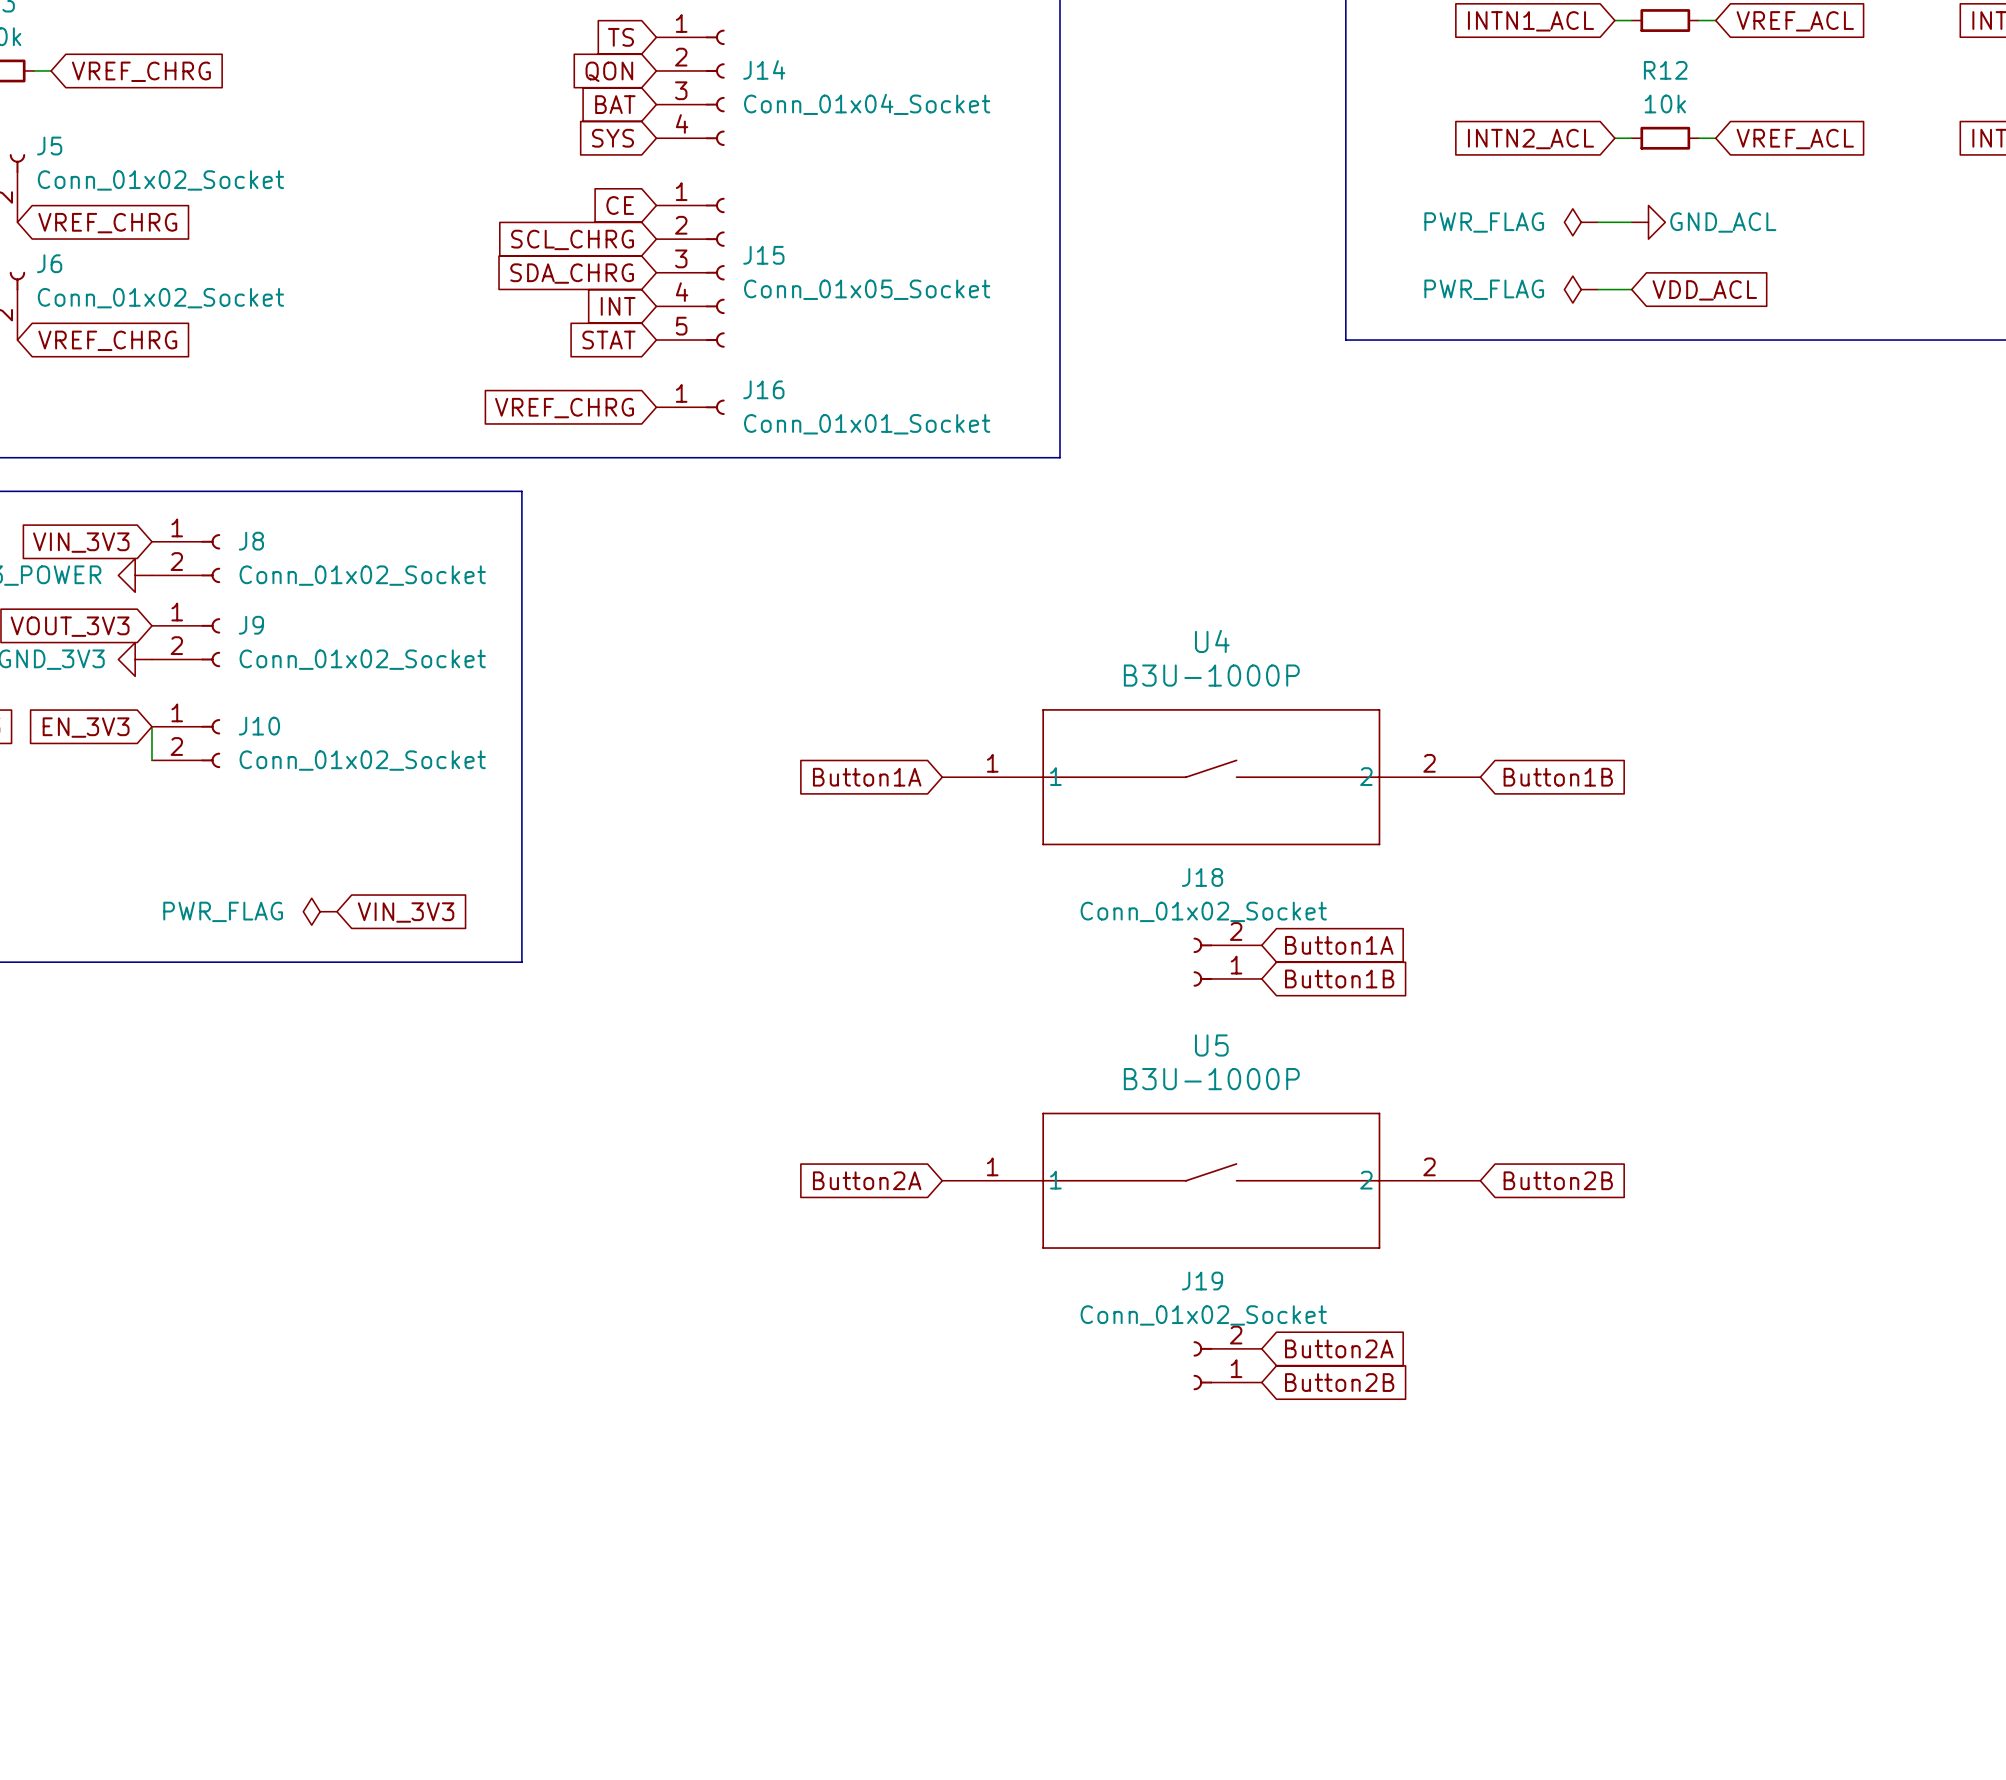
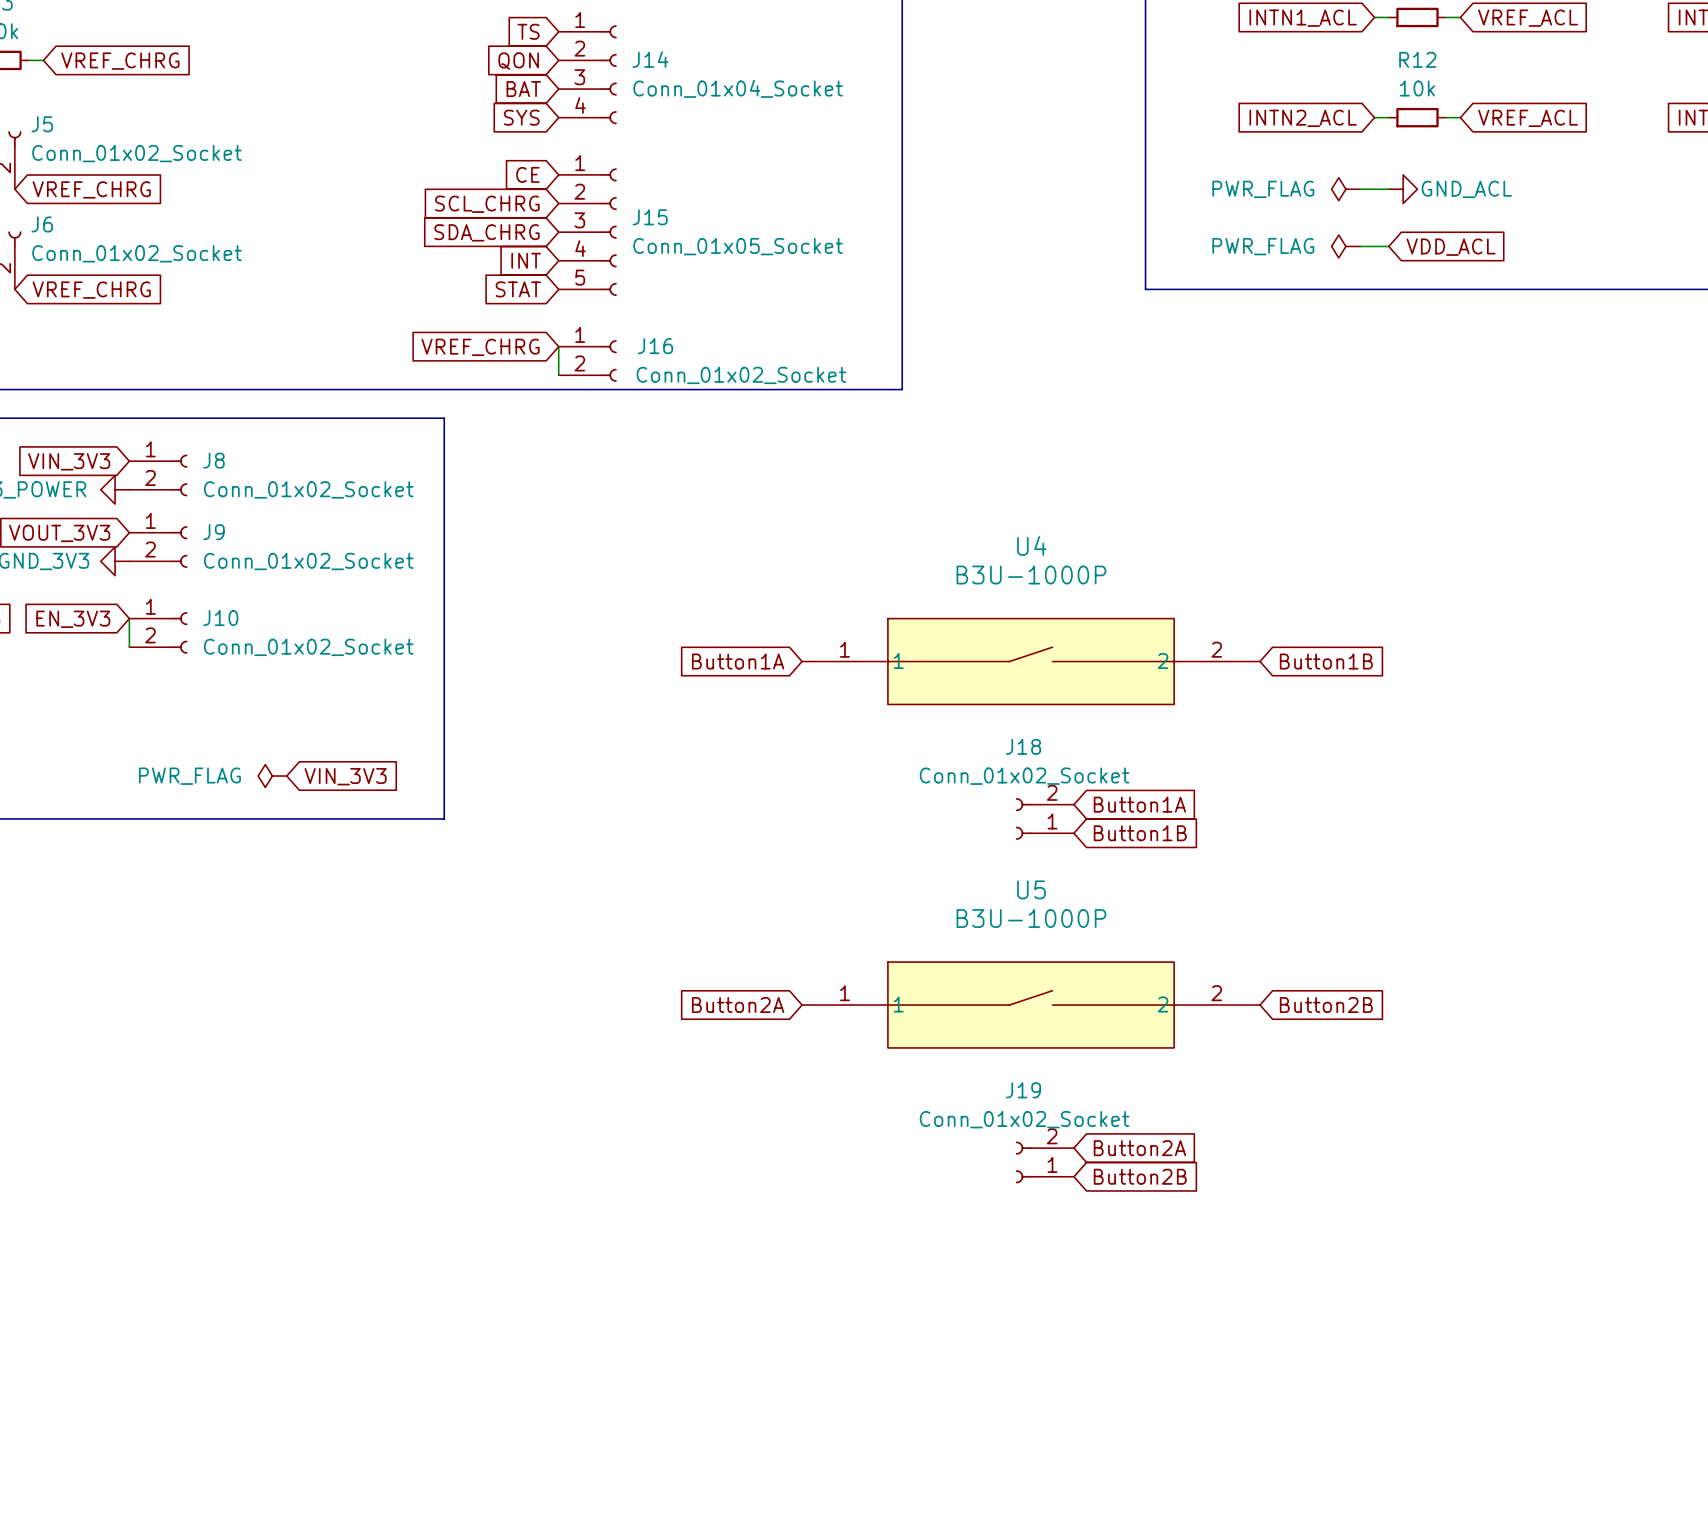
J16 symbol: [656, 399, 725, 416] -> [558, 340, 617, 382]
wire: none -> (558, 346) (558, 375)
J16 value: Conn_01x01_Socket (867, 424) -> Conn_01x02_Socket (741, 375)
U4 symbol: [942, 709, 1481, 846] -> [802, 618, 1261, 705]
U5 symbol: [942, 1112, 1481, 1249] -> [802, 962, 1261, 1048]

